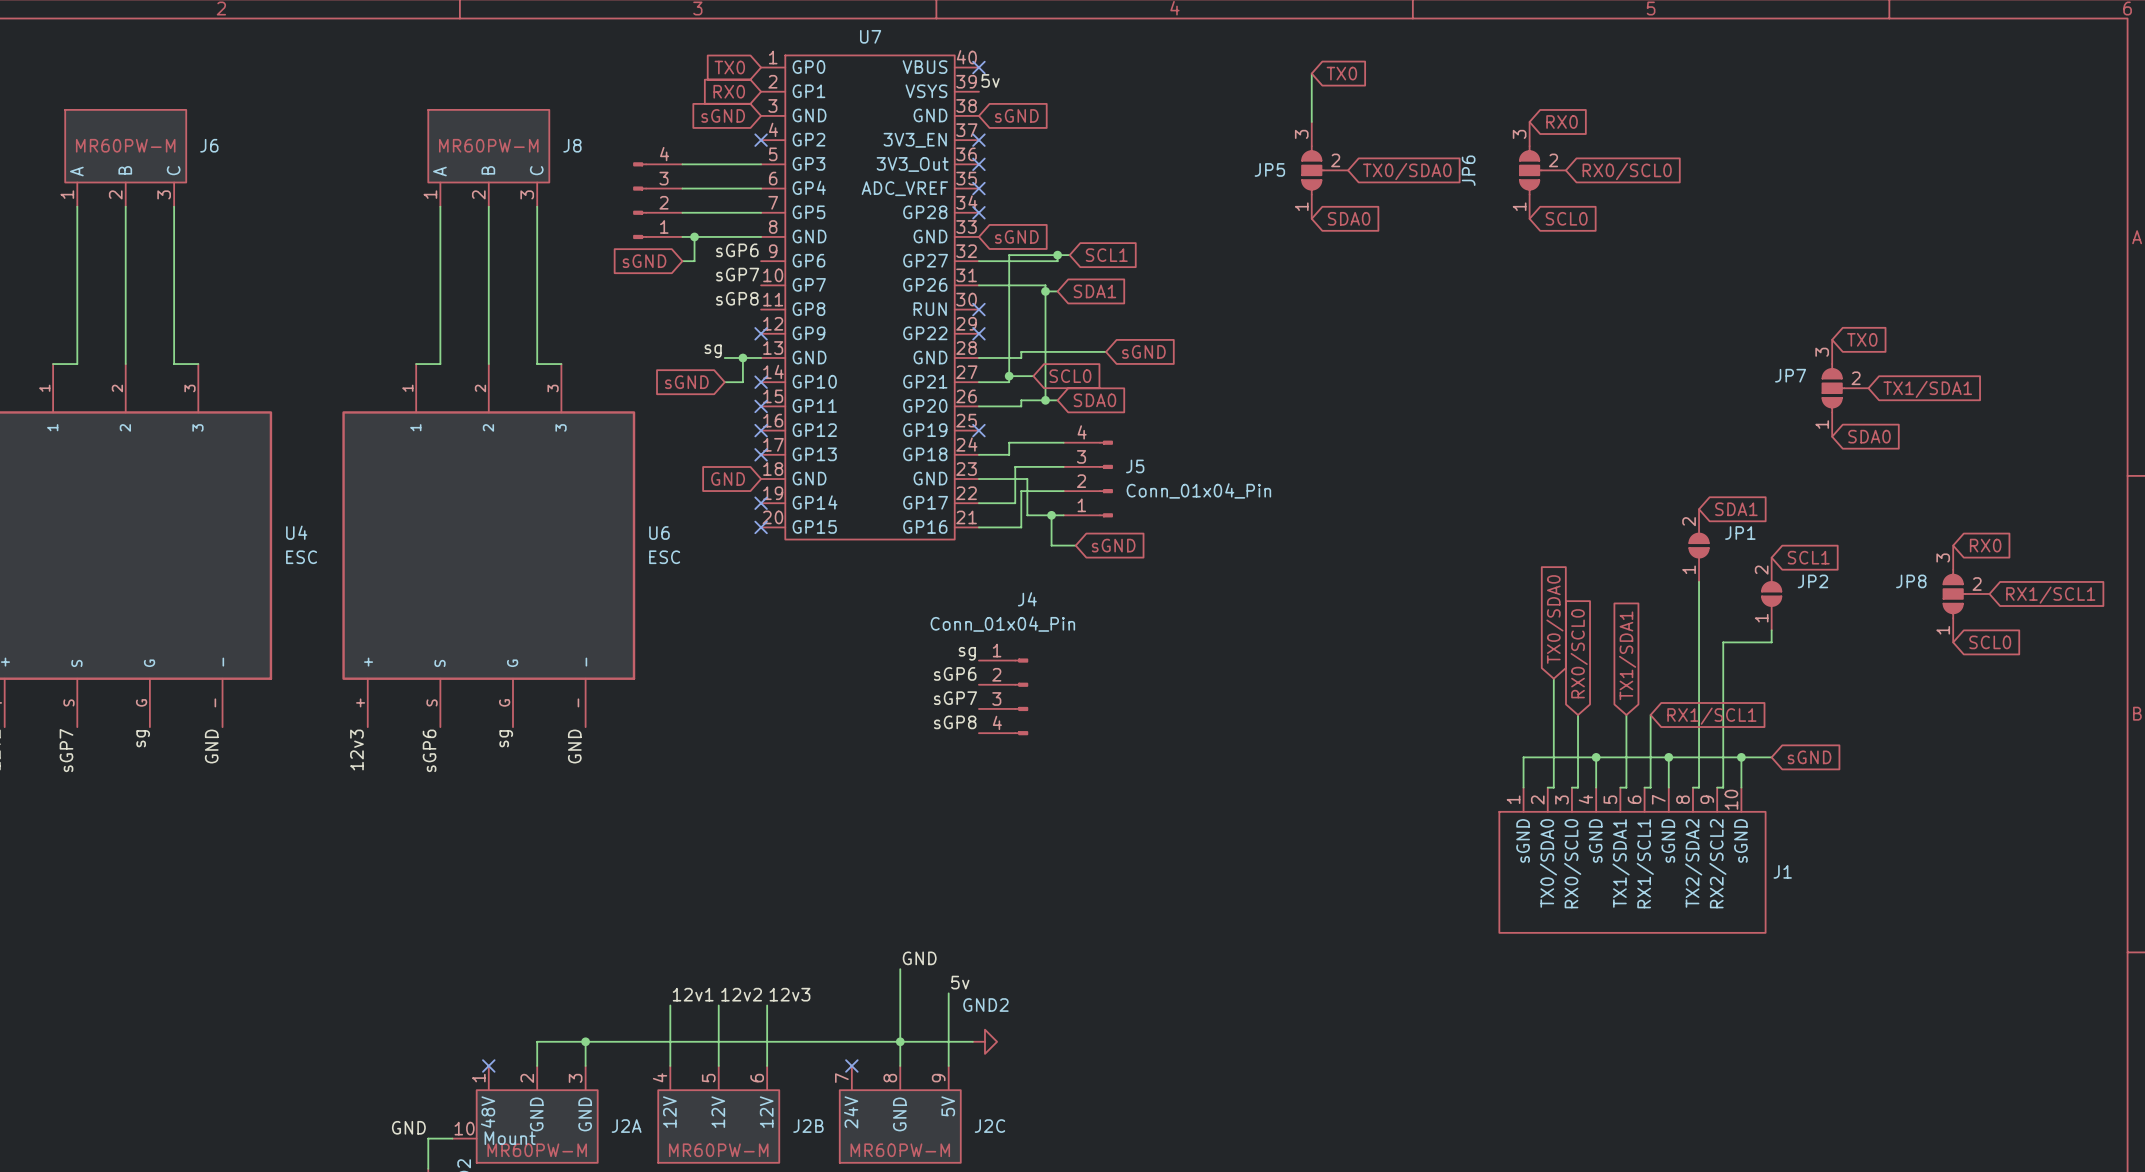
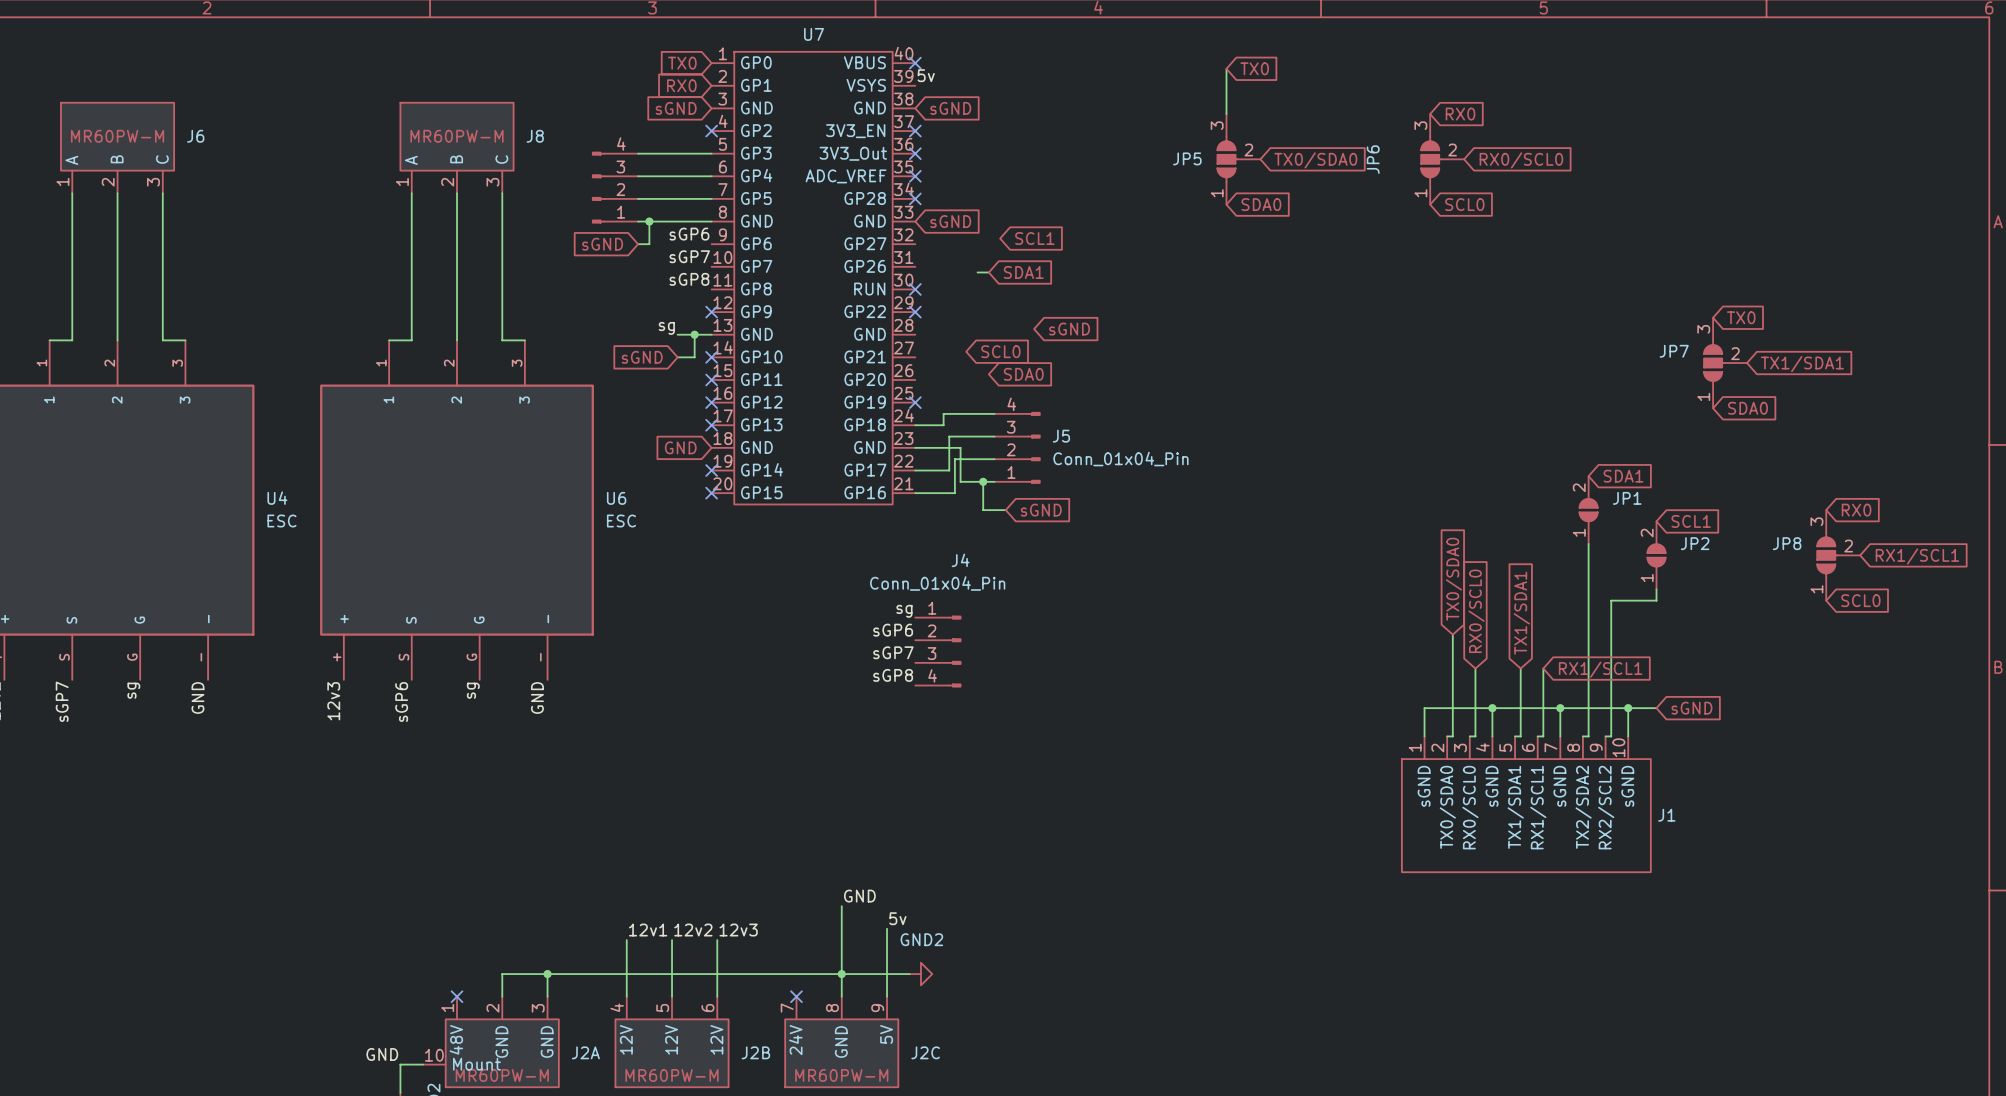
wire: (1057, 255) (1057, 261) (978, 261) -> none
junction: (1057, 255) -> none
wire: (1069, 255) (1009, 255) (1009, 382) (978, 382) -> none
wire: (978, 285) (1045, 285) (1045, 400) -> none
junction: (1045, 291) -> none
wire: (1106, 351) (1021, 351) (1021, 357) (978, 357) -> none
wire: (1009, 376) (1033, 376) -> none
junction: (1009, 376) -> none
junction: (1045, 400) -> none
wire: (1057, 400) (1021, 400) (1021, 406) (978, 406) -> none

